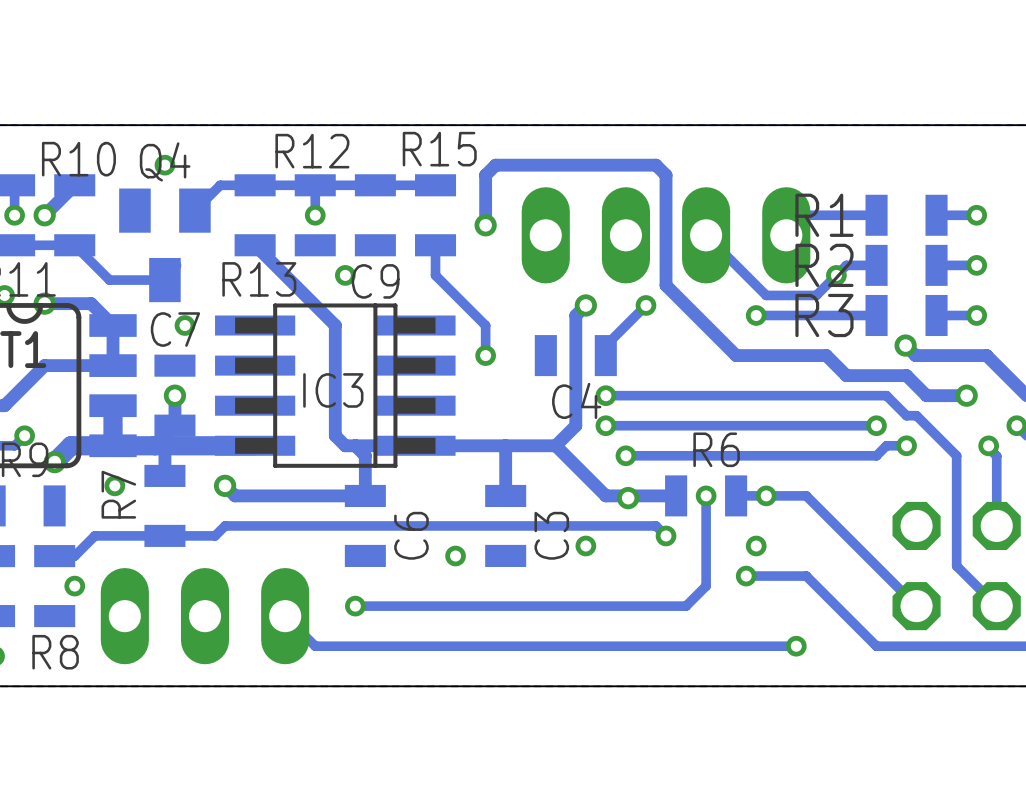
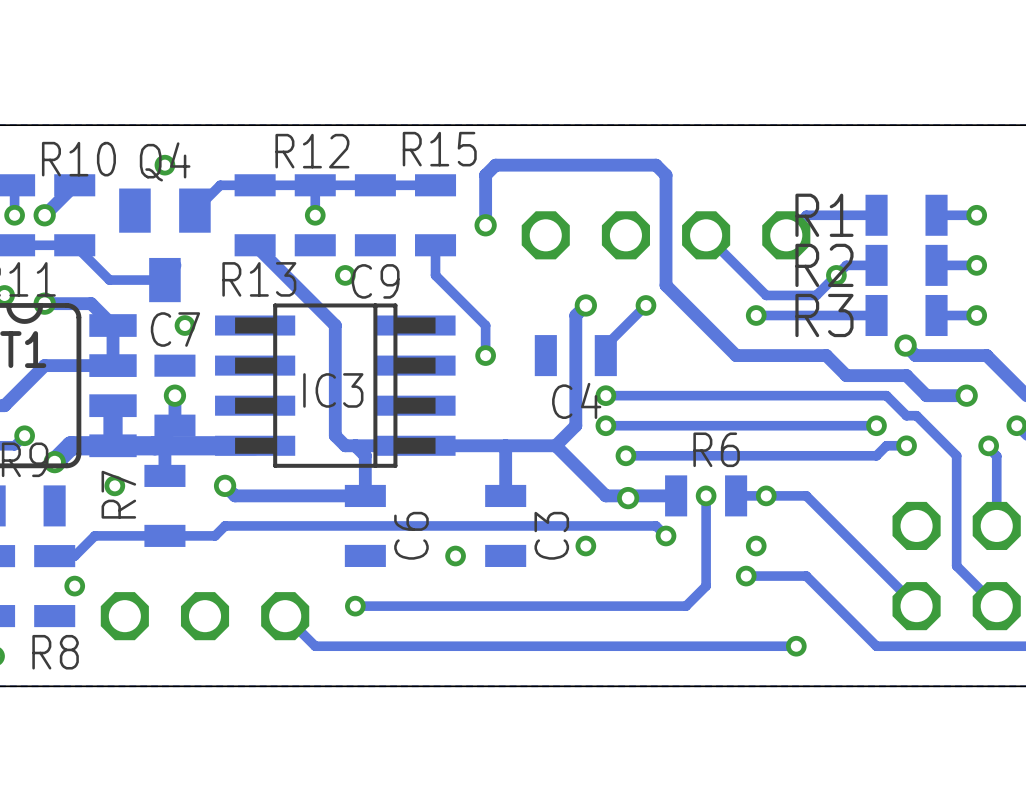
part footprint: [521, 187, 811, 284] -> [521, 211, 811, 260]
part footprint: [100, 568, 310, 665] -> [100, 592, 310, 641]

